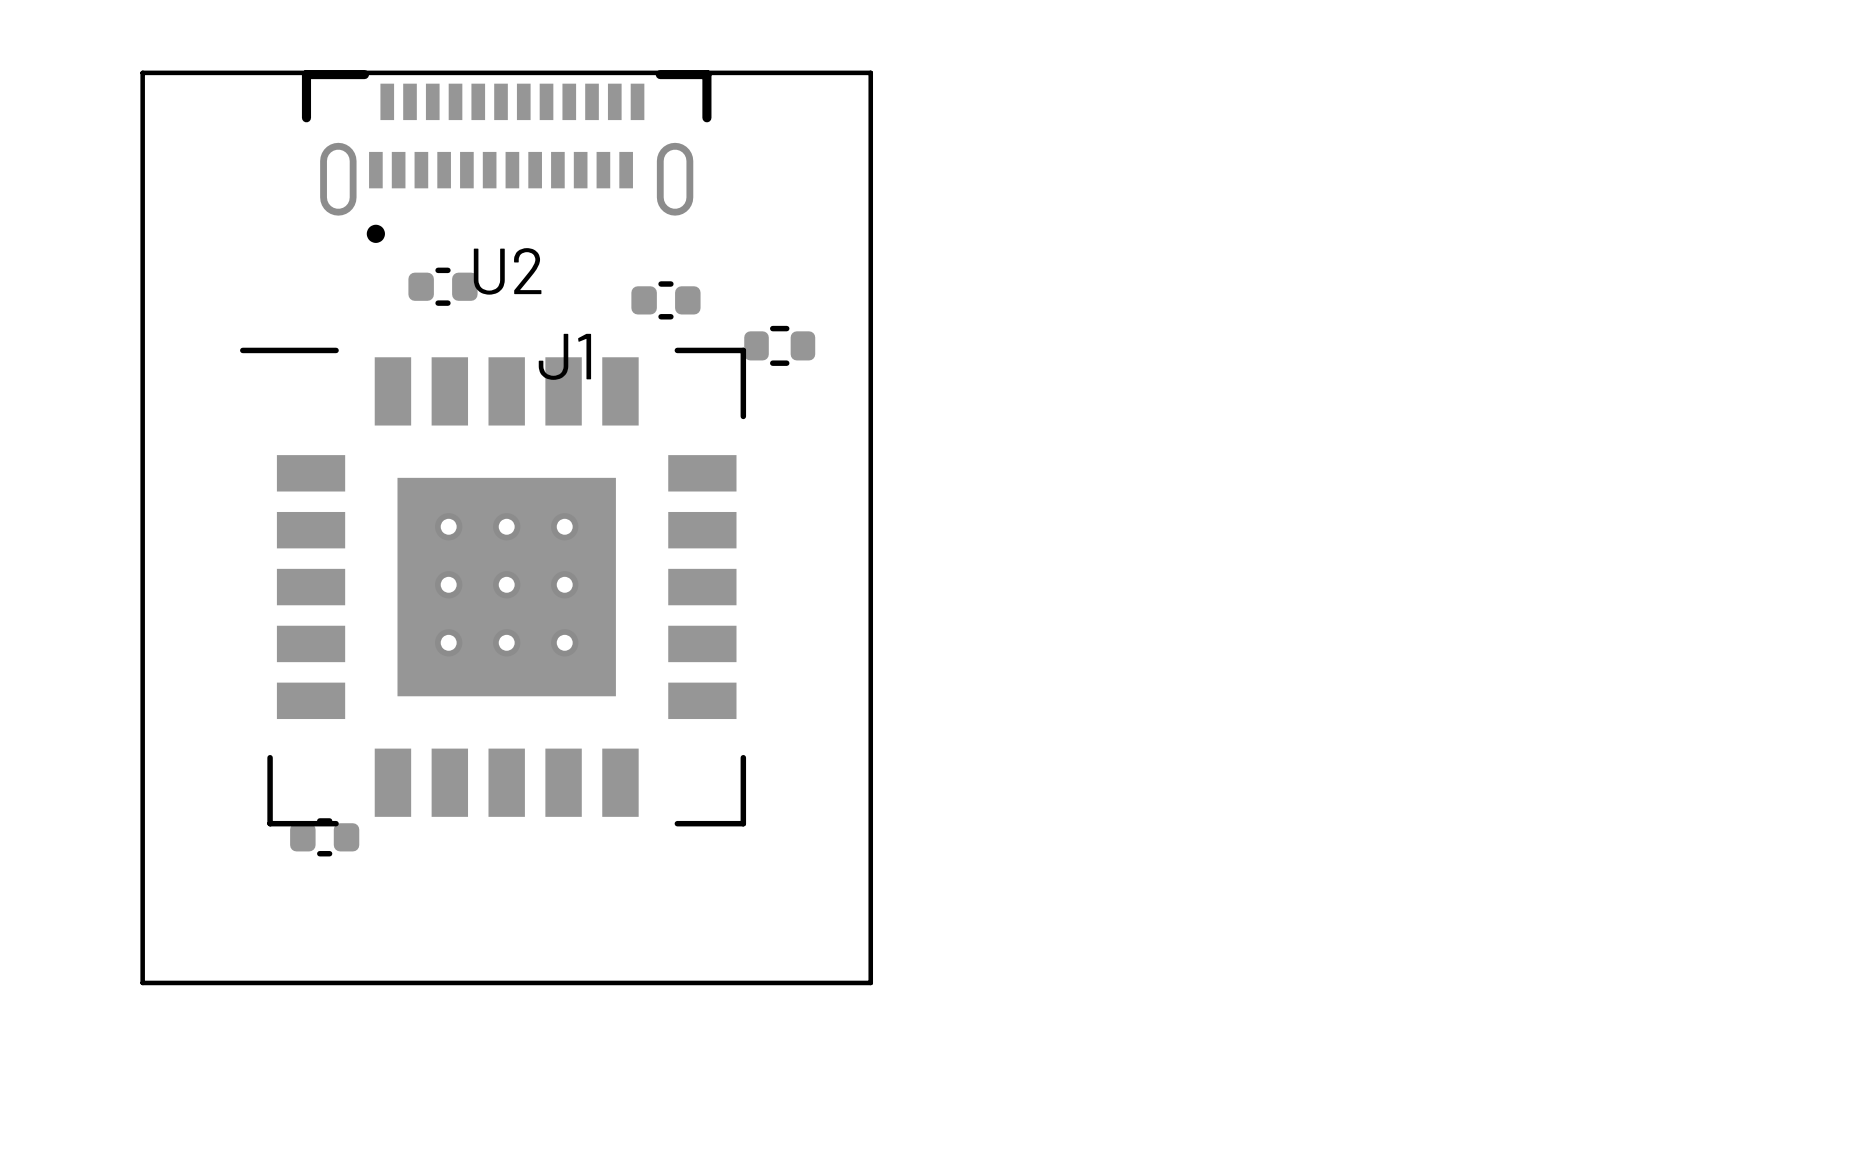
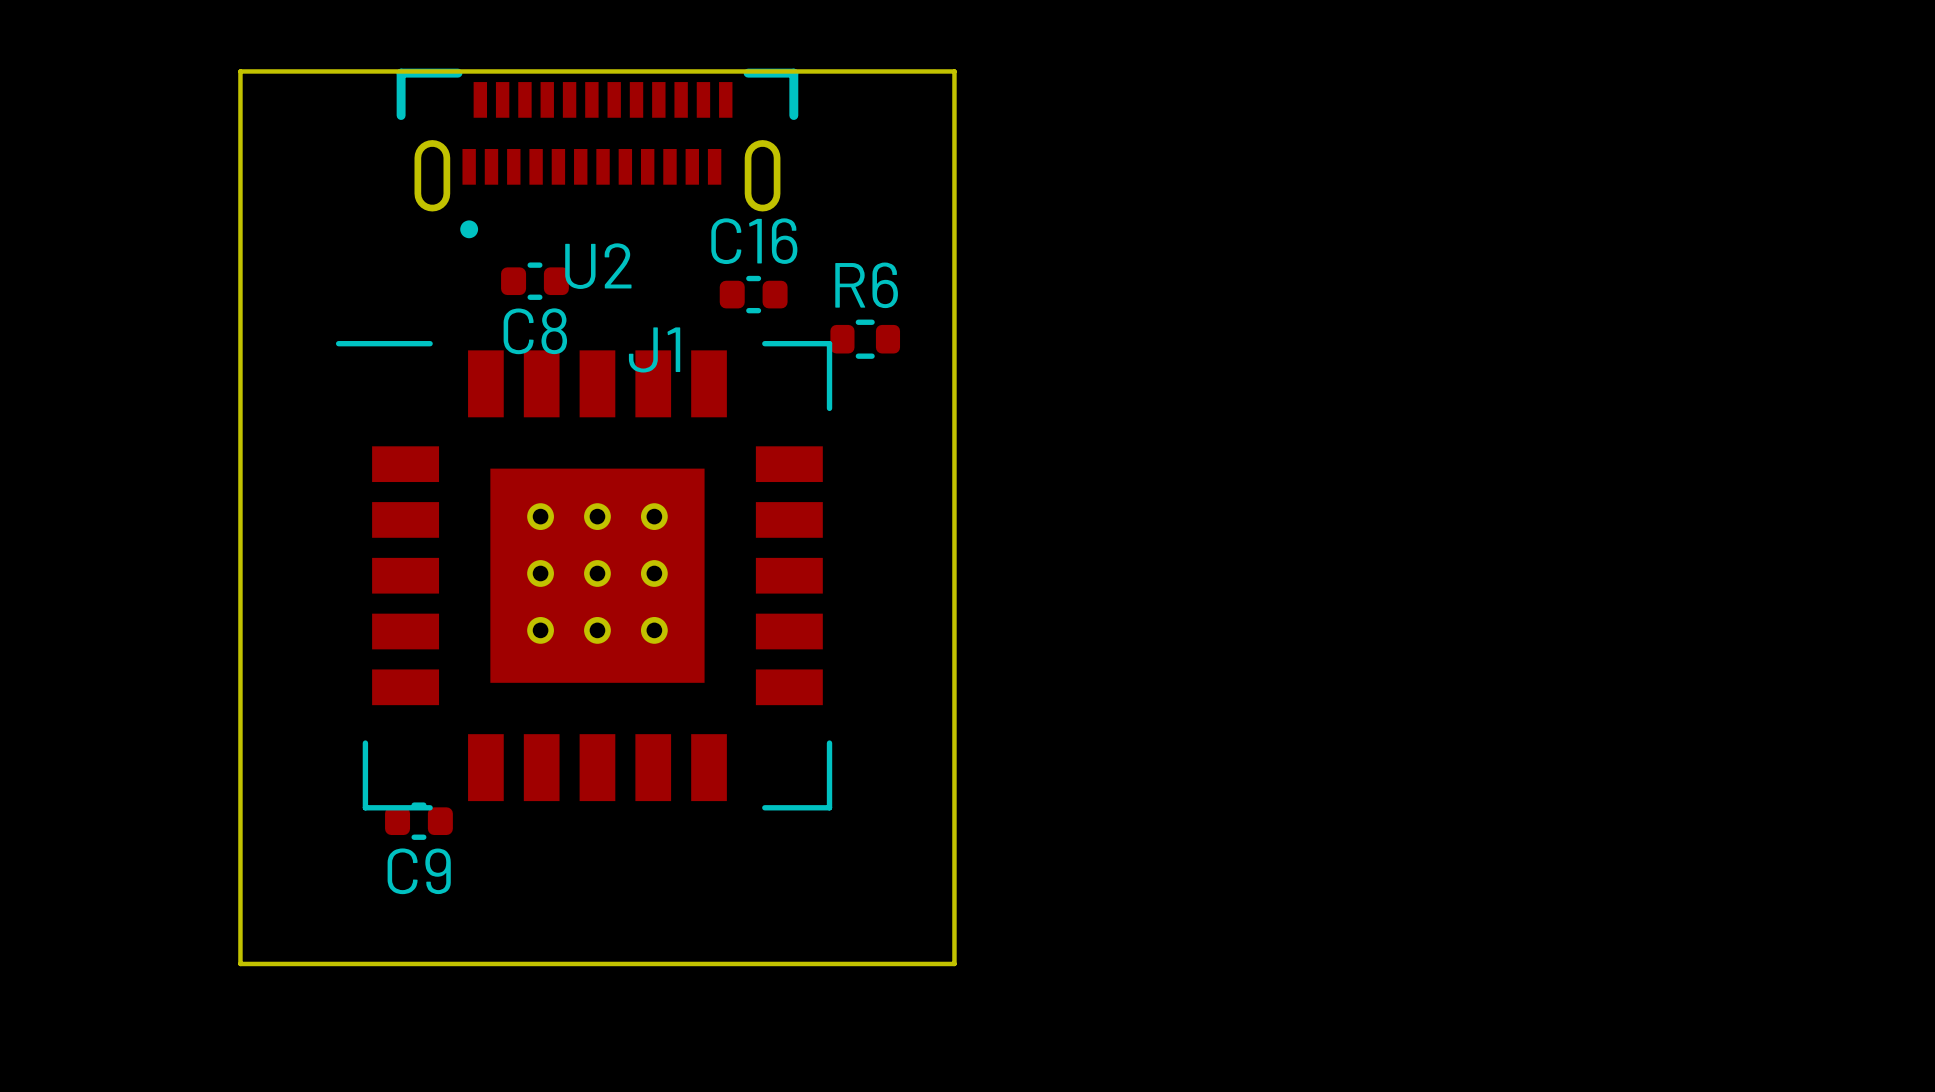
C16 name: none -> C16 (754, 241)
R6 name: none -> R6 (866, 285)
C8 name: none -> C8 (535, 331)
C9 name: none -> C9 (419, 871)

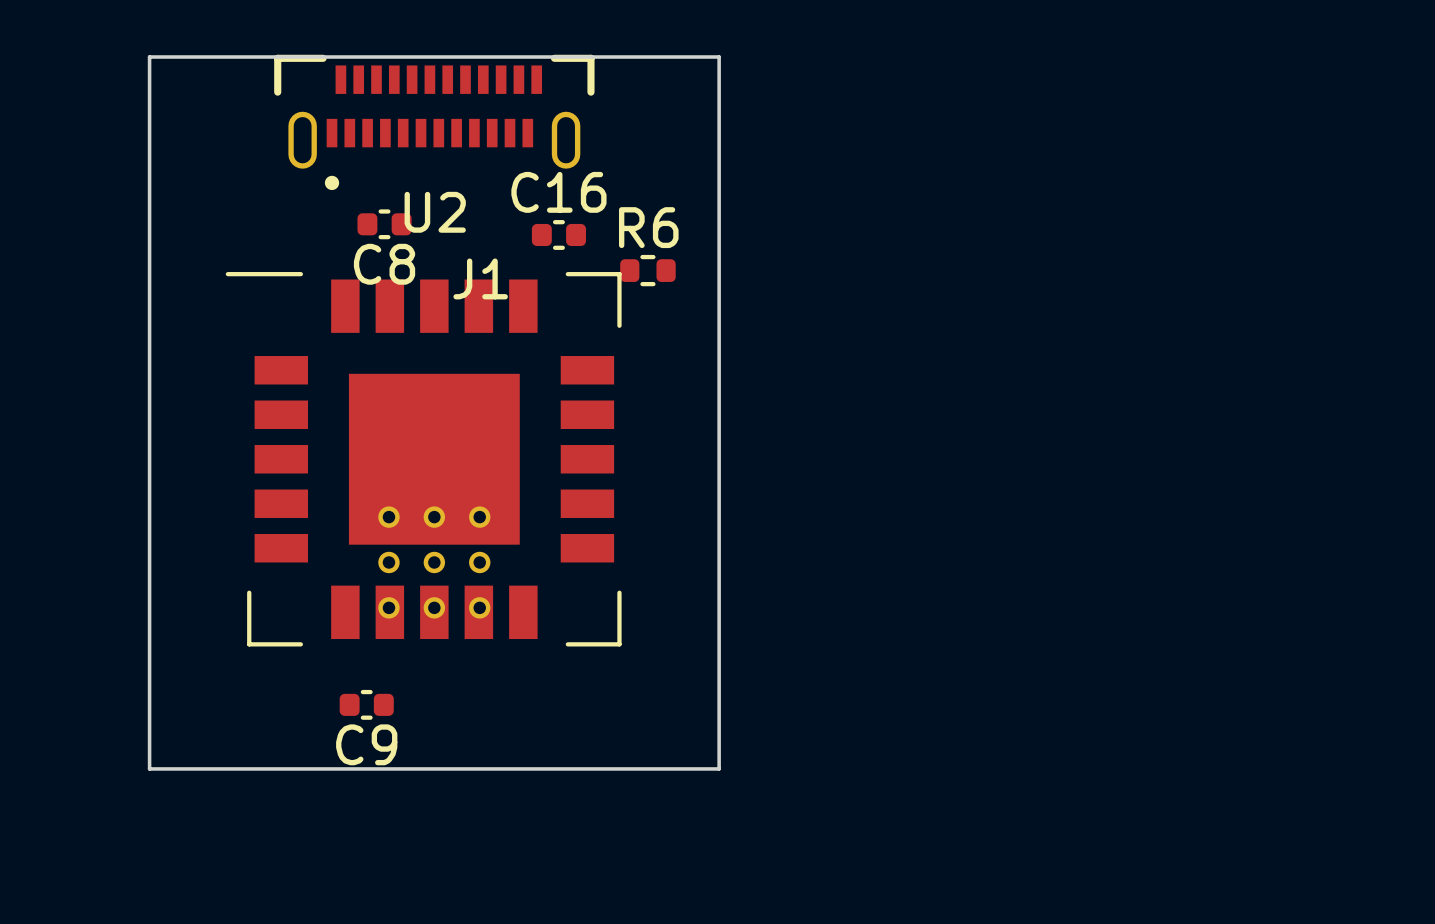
part position: (597, 573) -> (434, 562)
C9 position: (418, 821) -> (366, 704)

